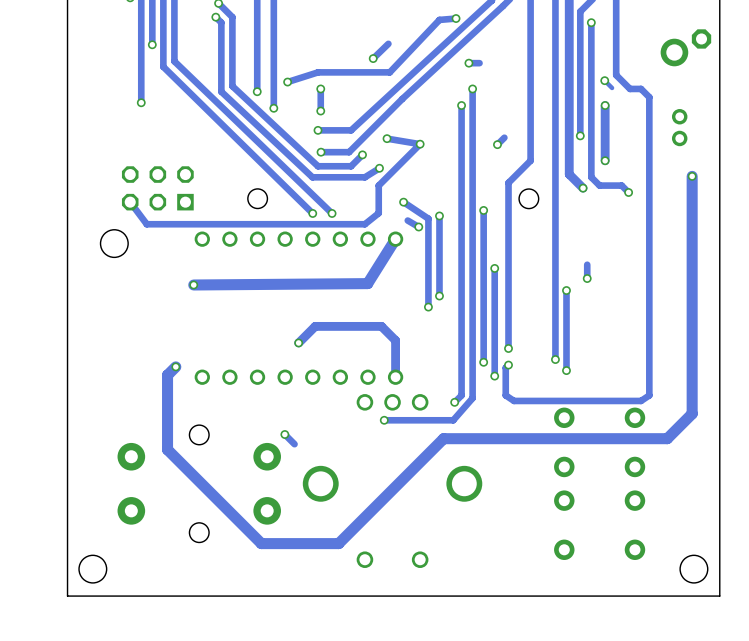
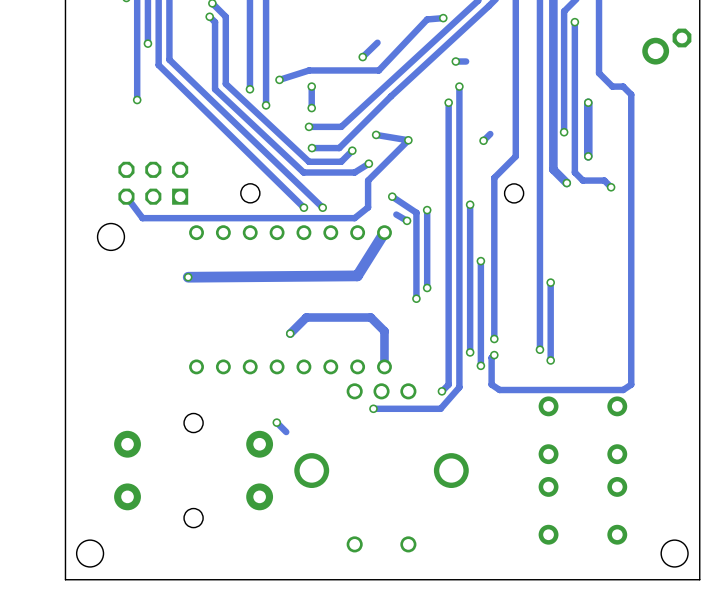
track: (604, 80) (612, 88) -> none
via: (604, 80) -> none
part: (679, 127) -> none
track: (692, 176) (692, 413) (667, 438) (443, 438) (338, 543) (261, 543) (167, 449) (167, 375) (175, 366) -> none
via: (692, 176) -> none
track: (587, 264) (587, 278) -> none
via: (587, 278) -> none
via: (175, 366) -> none

